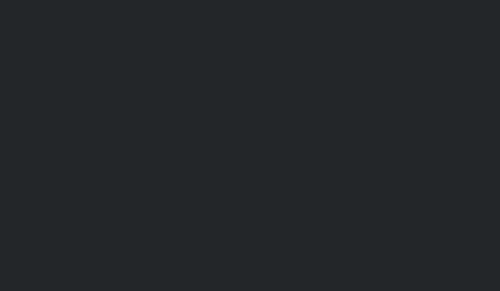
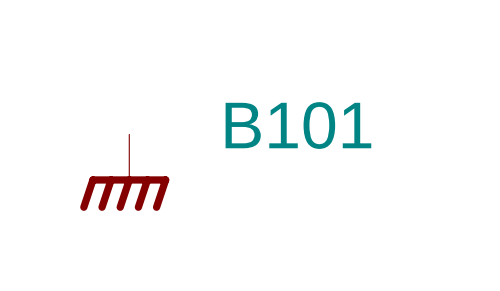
B101: none -> (124, 172)

